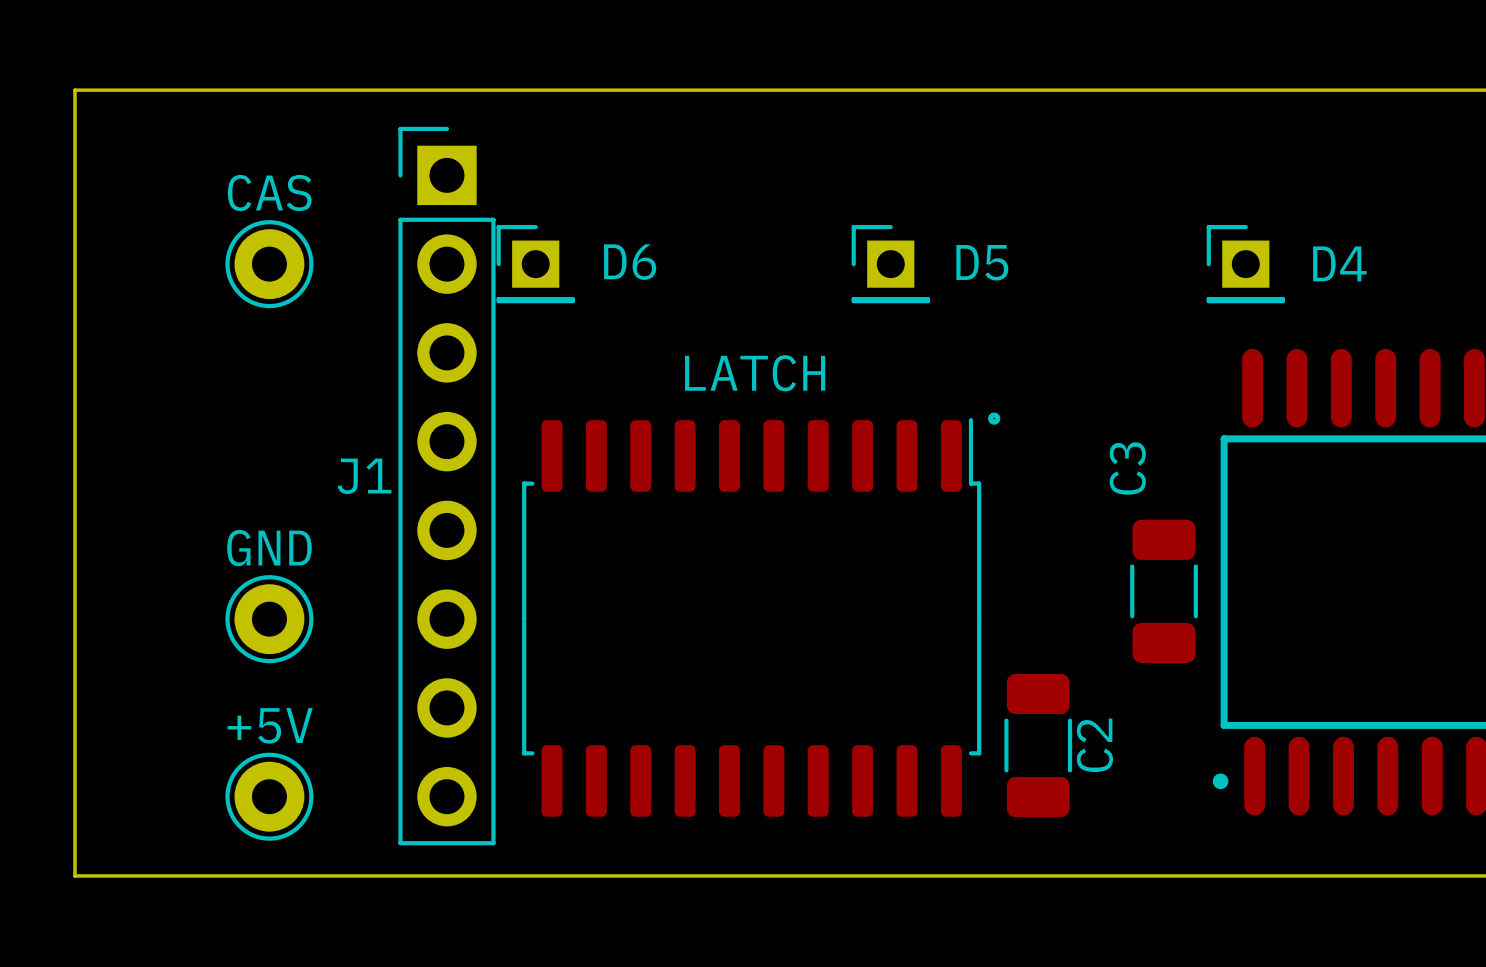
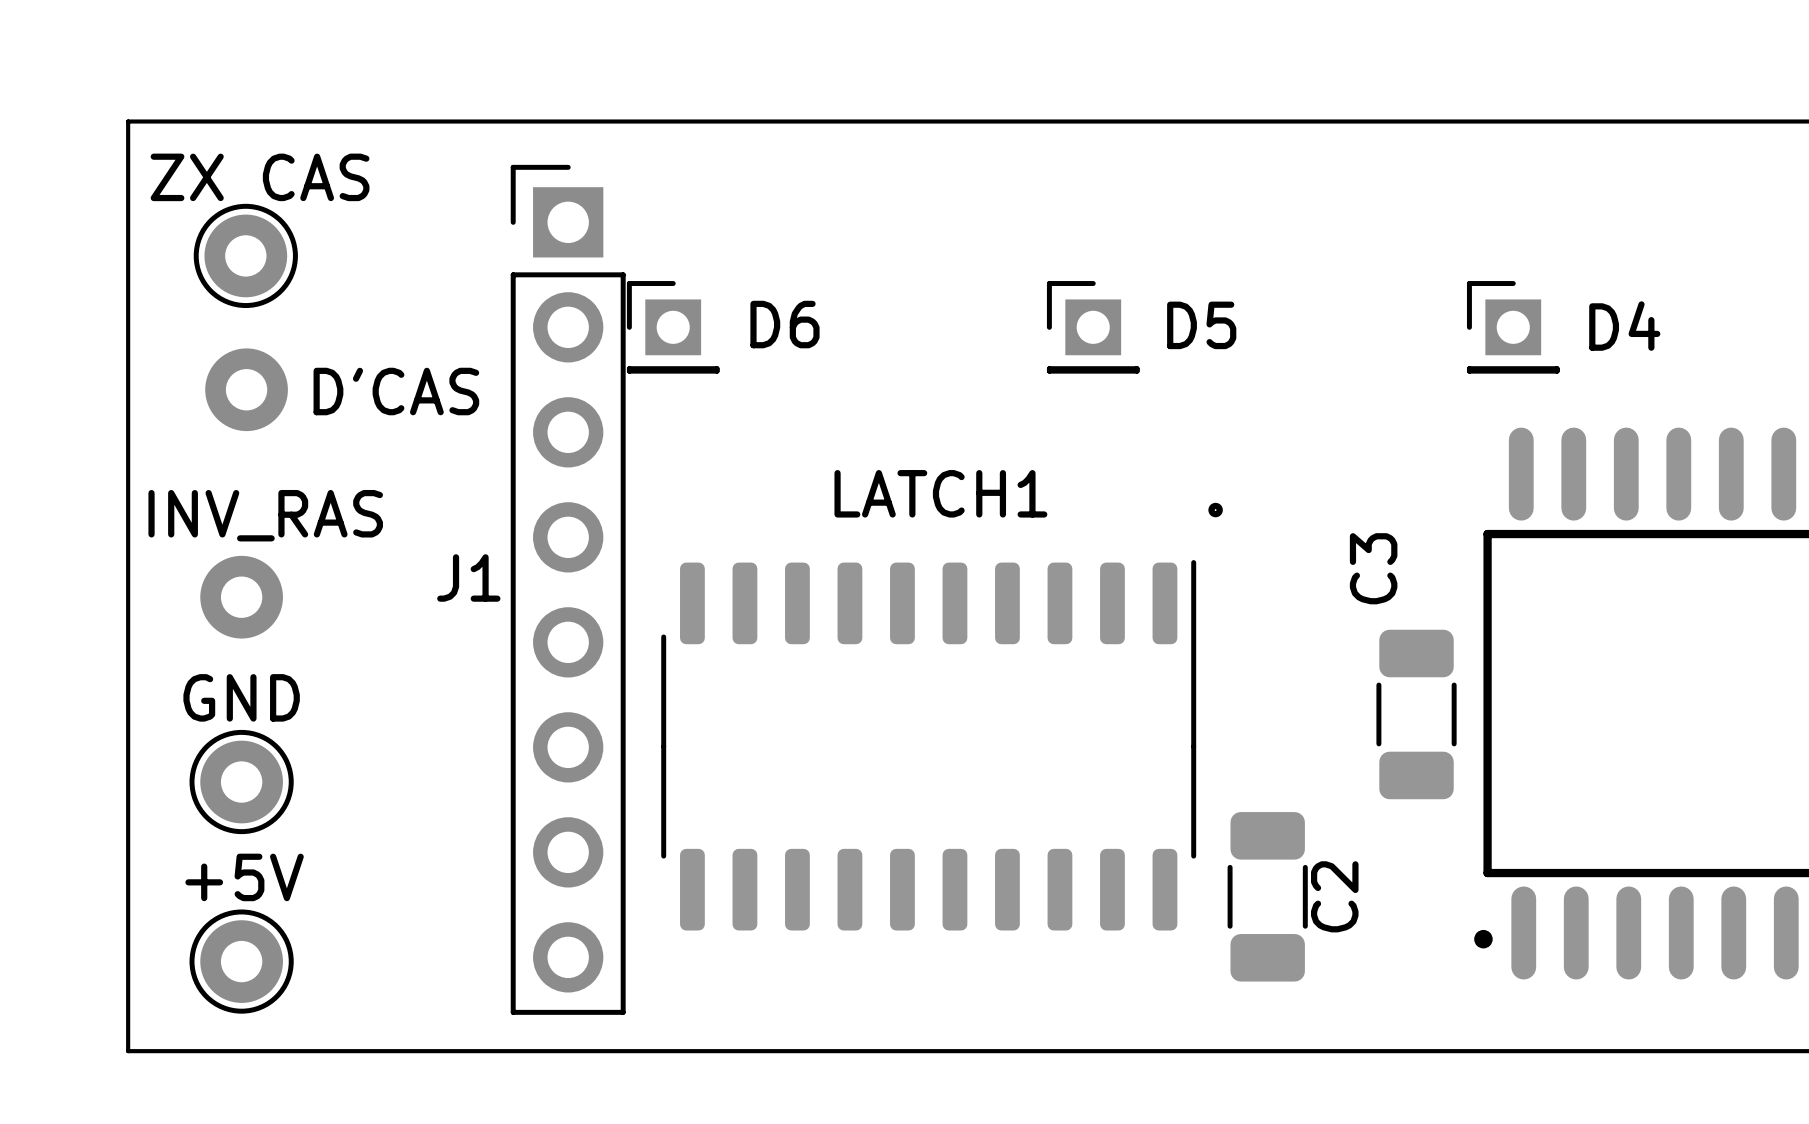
ZX CAS: none -> (245, 255)
CAS: (269, 264) -> none
part: none -> (246, 389)
text: none -> D'CAS (396, 391)
text: none -> INV_RAS (265, 515)
part: none -> (241, 597)
LATCH: (751, 617) -> none
LATCH1: none -> (928, 745)
GND position: (269, 619) -> (241, 782)
+5V position: (269, 796) -> (241, 961)

